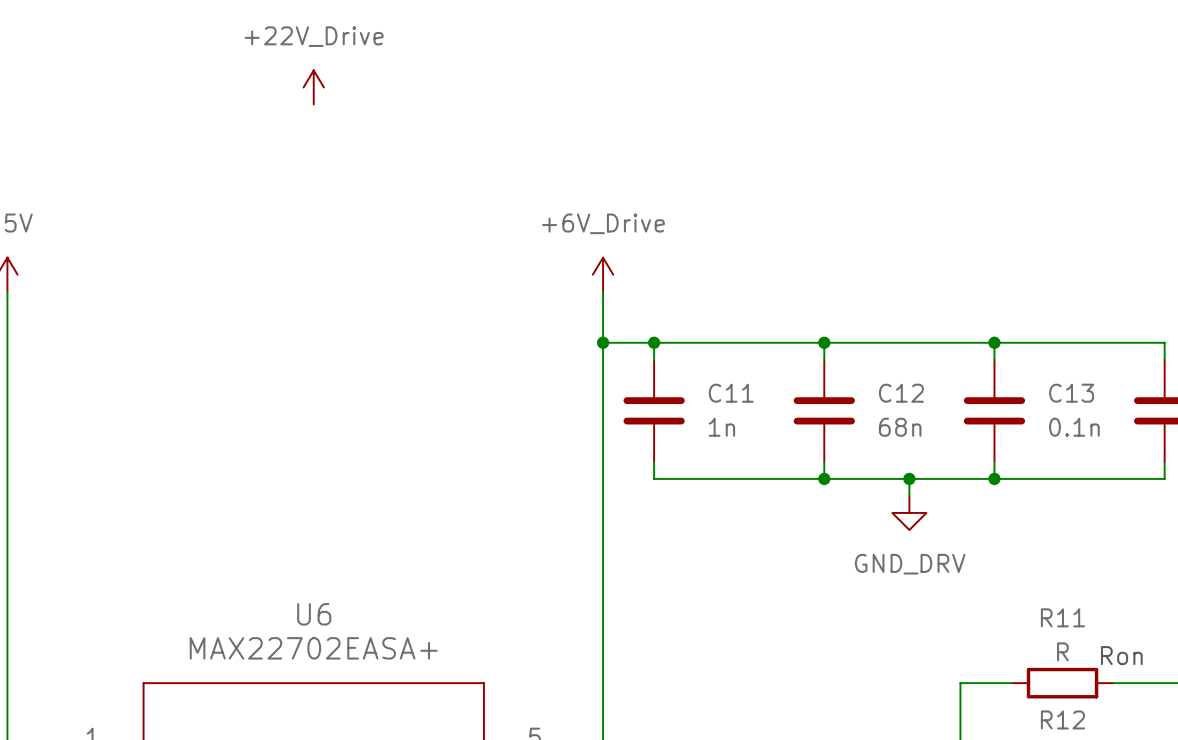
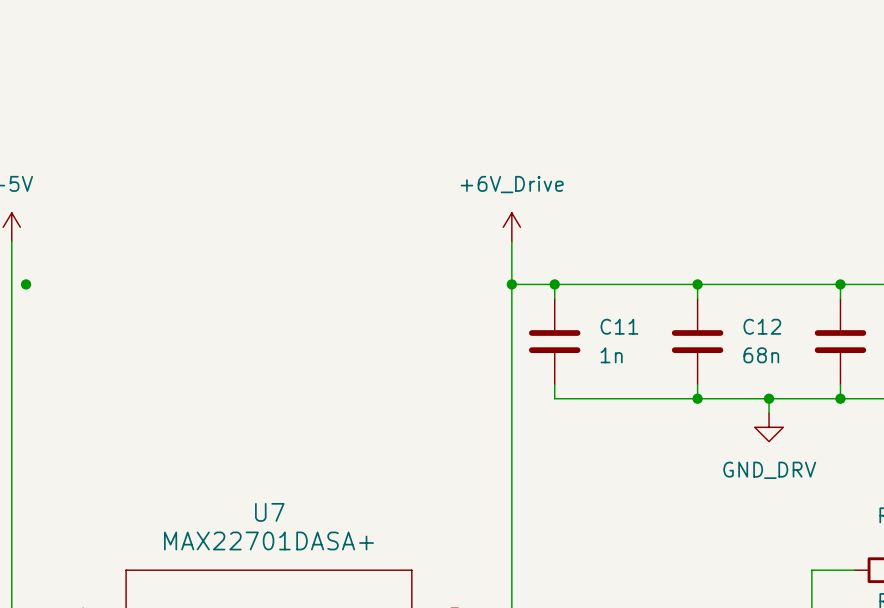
power symbol: +22V_Drive (313, 87) -> none
junction: none -> (26, 284)
U6 name: U6 (314, 614) -> U7 (269, 512)
U6 value: MAX22702EASA+ (313, 648) -> MAX22701DASA+ (268, 540)

